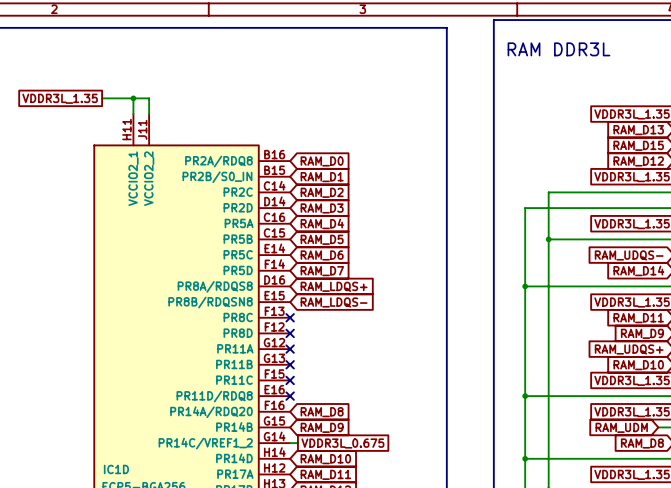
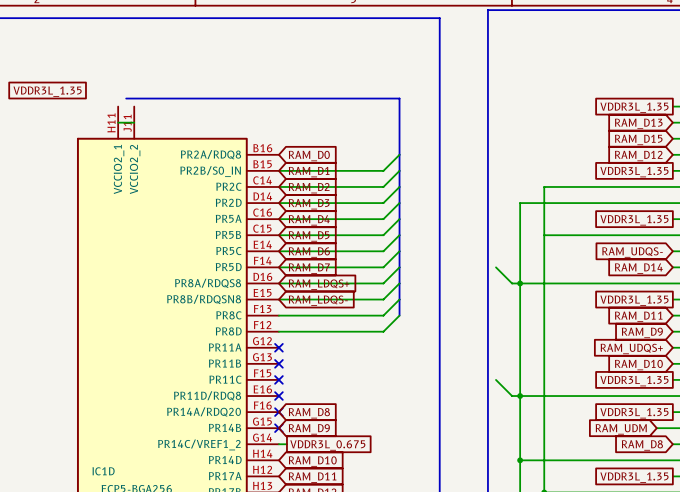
text: RAM DDR3L (558, 49) -> none
wire: (102, 98) (149, 98) (149, 114) -> none
wire: (133, 98) (133, 114) -> none
junction: (133, 98) -> none
bus: none -> (126, 98) (399, 98) (399, 315)
wire: none -> (118, 122) (134, 122)
wire: none -> (399, 154) (383, 170) (278, 170)
wire: none -> (399, 170) (383, 186) (278, 186)
wire: none -> (399, 186) (383, 203) (278, 203)
wire: none -> (399, 203) (383, 219) (278, 219)
wire: none -> (399, 219) (383, 235) (278, 235)
wire: none -> (399, 235) (383, 251) (278, 251)
junction: (548, 239) -> none
wire: none -> (399, 251) (383, 267) (278, 267)
wire: none -> (399, 267) (383, 283) (278, 283)
wire: none -> (496, 267) (512, 283) (520, 283)
wire: none -> (399, 283) (383, 299) (278, 299)
wire: none -> (399, 299) (383, 315) (278, 315)
no-connect mark: (290, 317) -> none
wire: none -> (399, 315) (383, 331) (278, 331)
no-connect mark: (290, 333) -> none
wire: none -> (496, 379) (512, 396) (520, 396)
no-connect mark: none -> (278, 412)
no-connect mark: none -> (278, 428)

